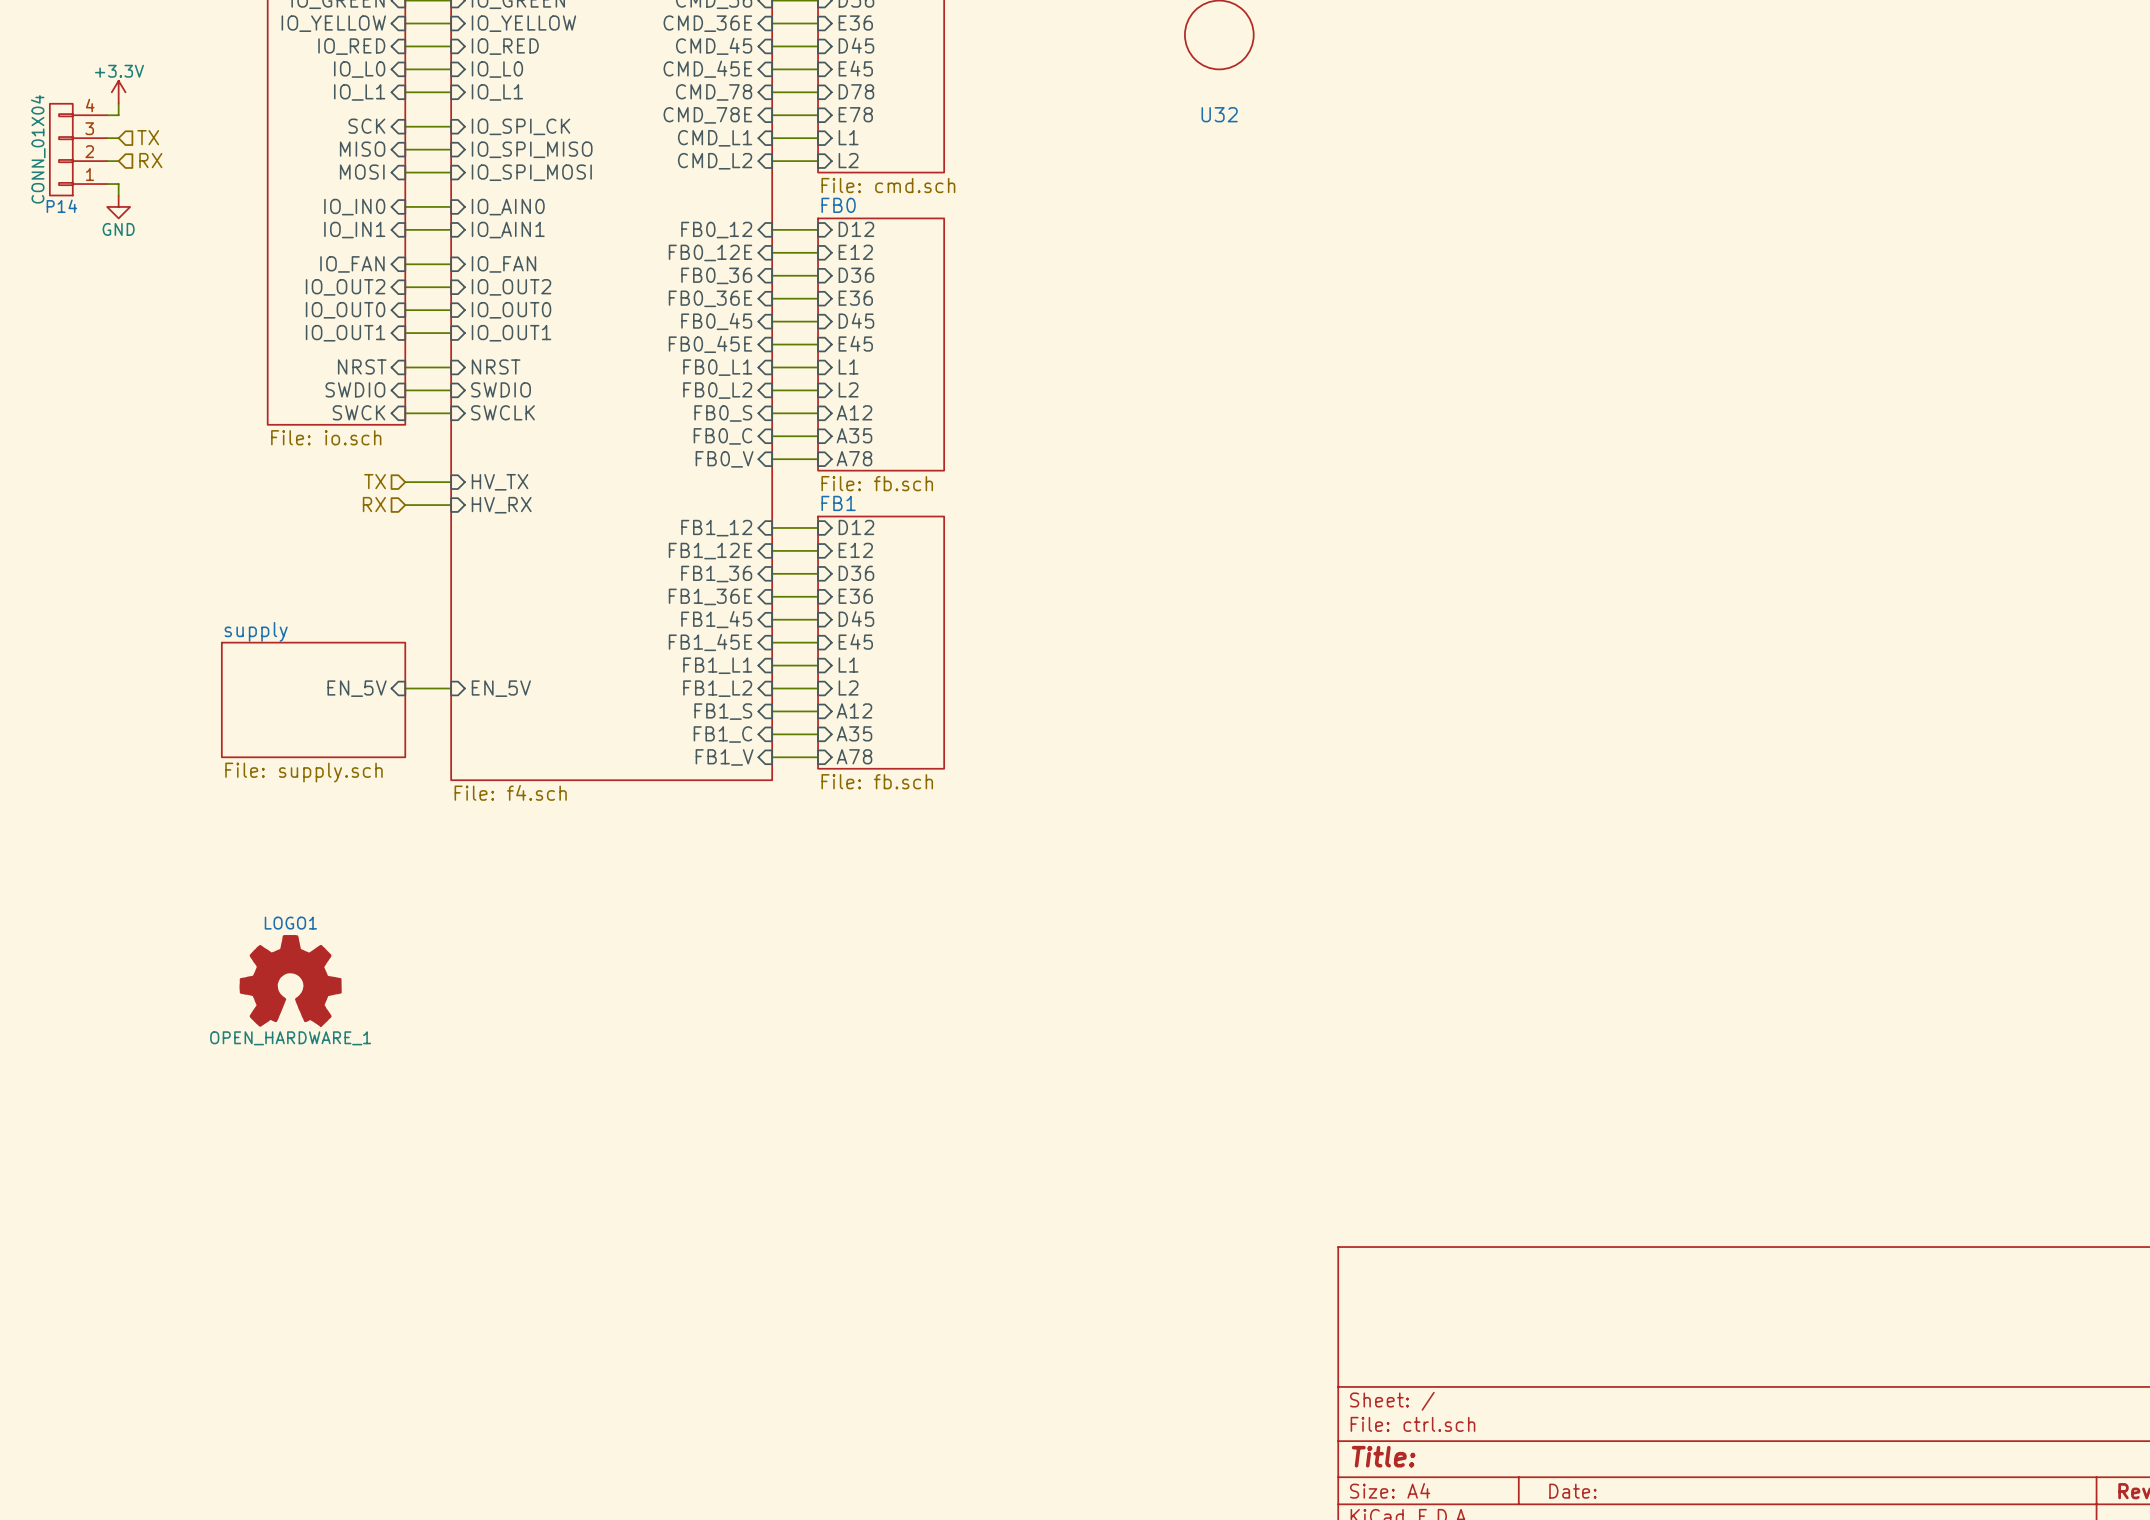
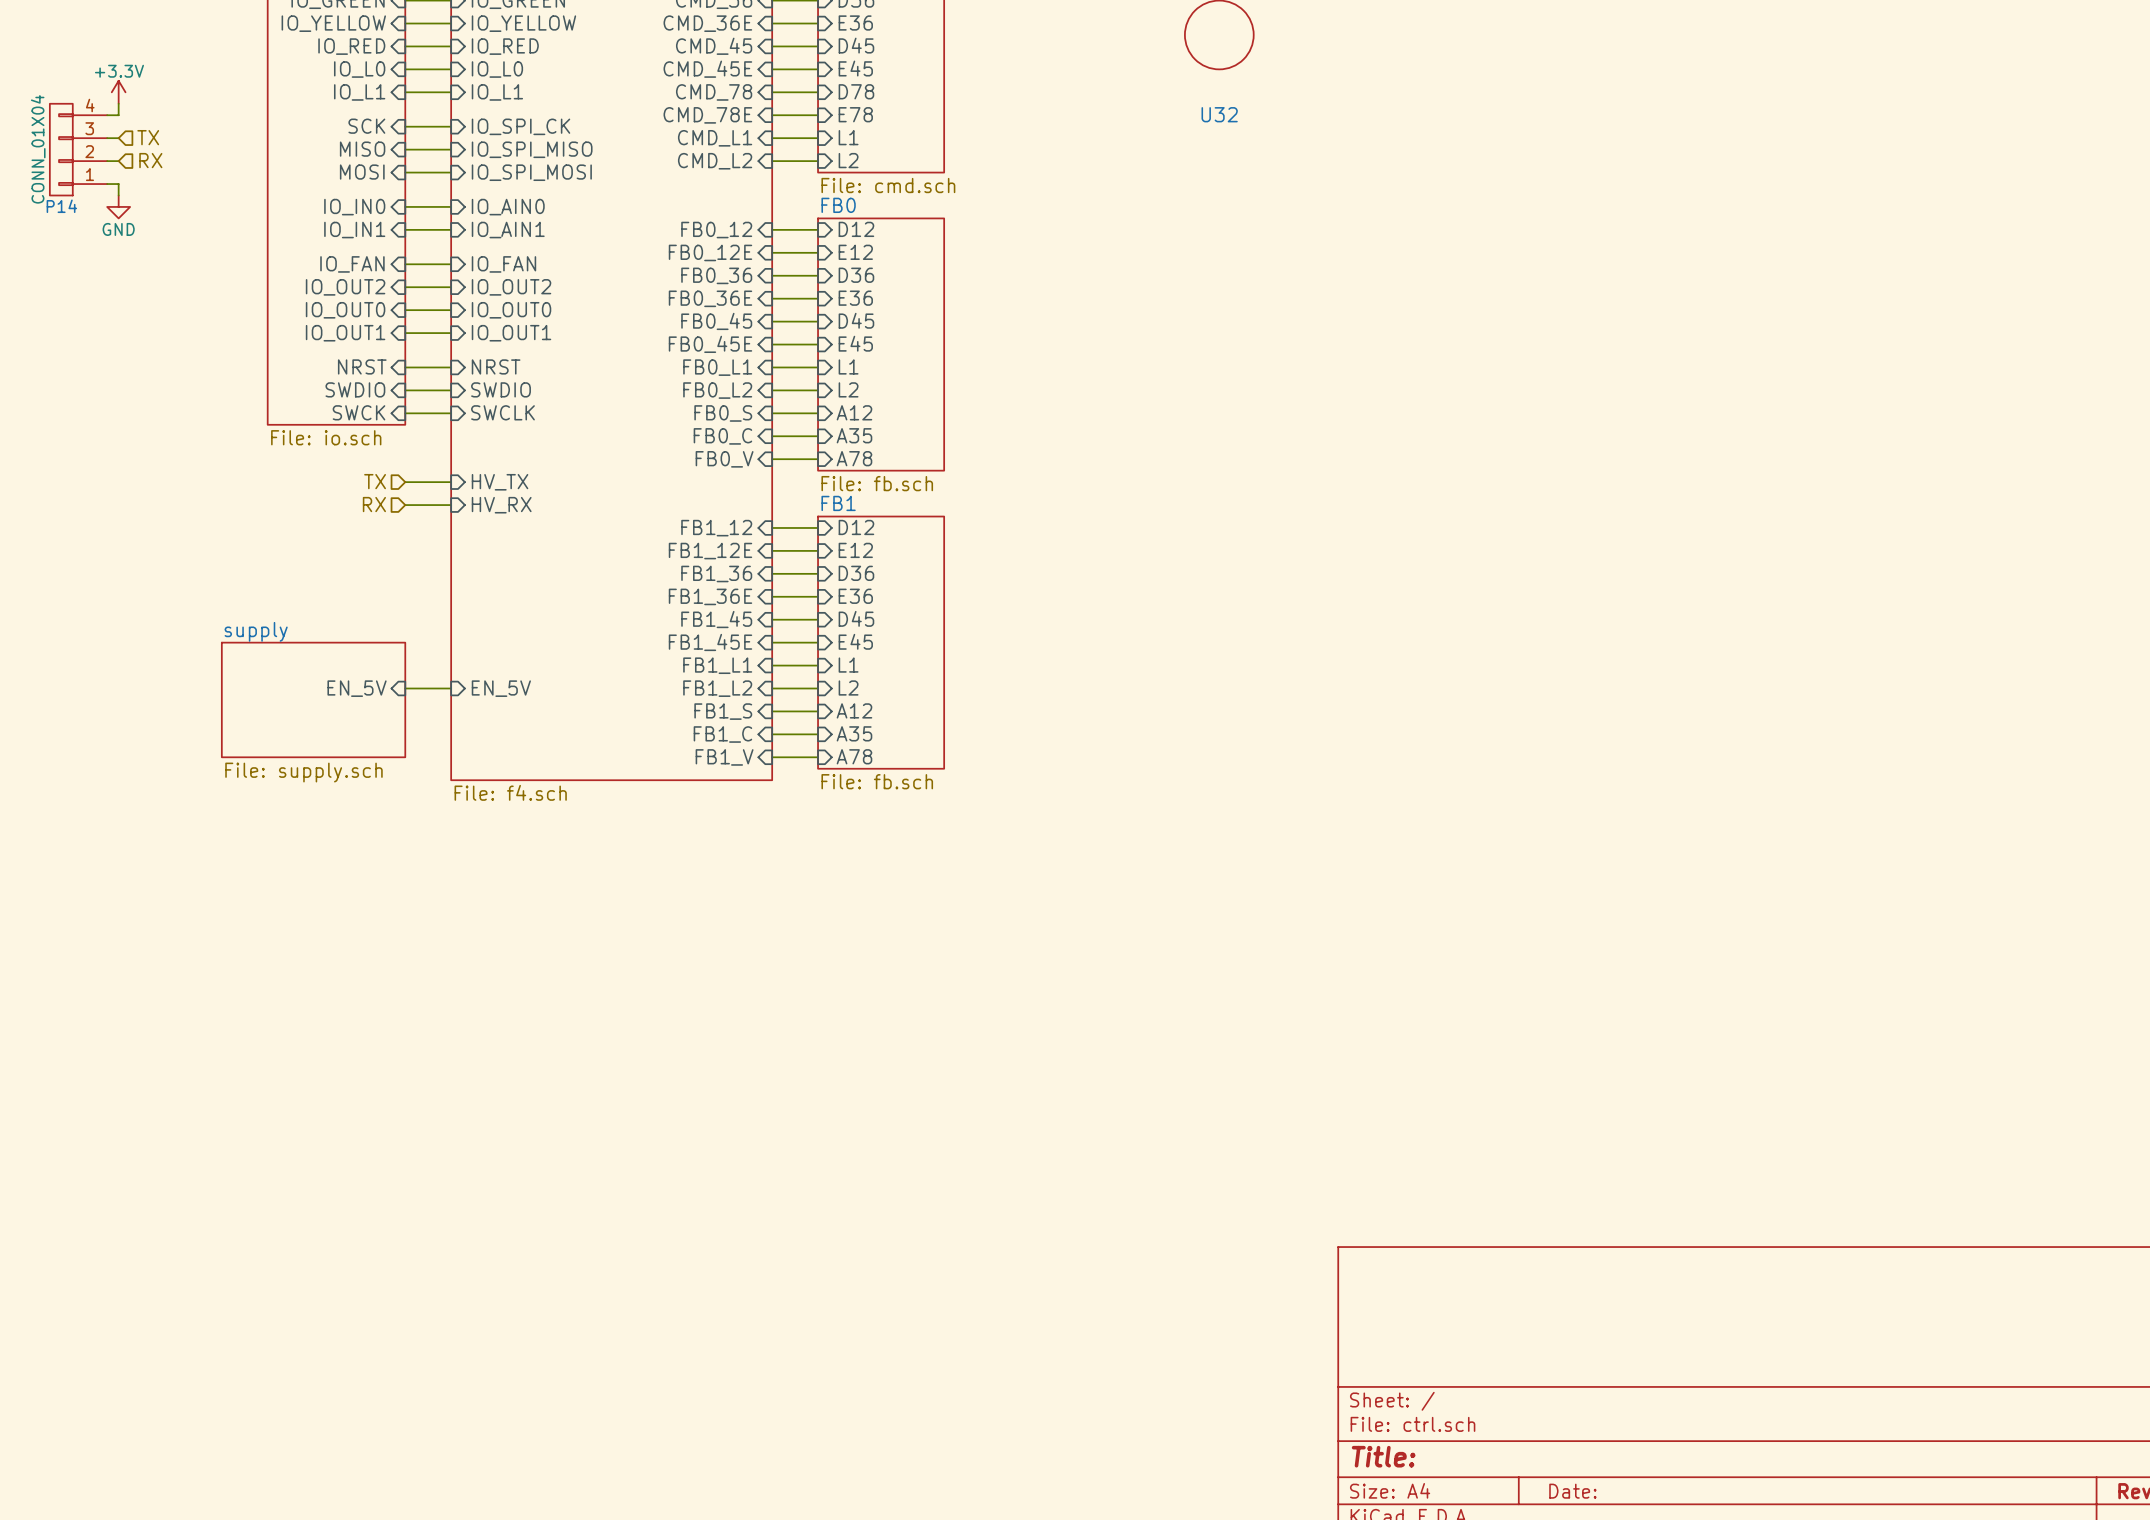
LOGO1: OPEN_HARDWARE_1 (290, 980) -> none

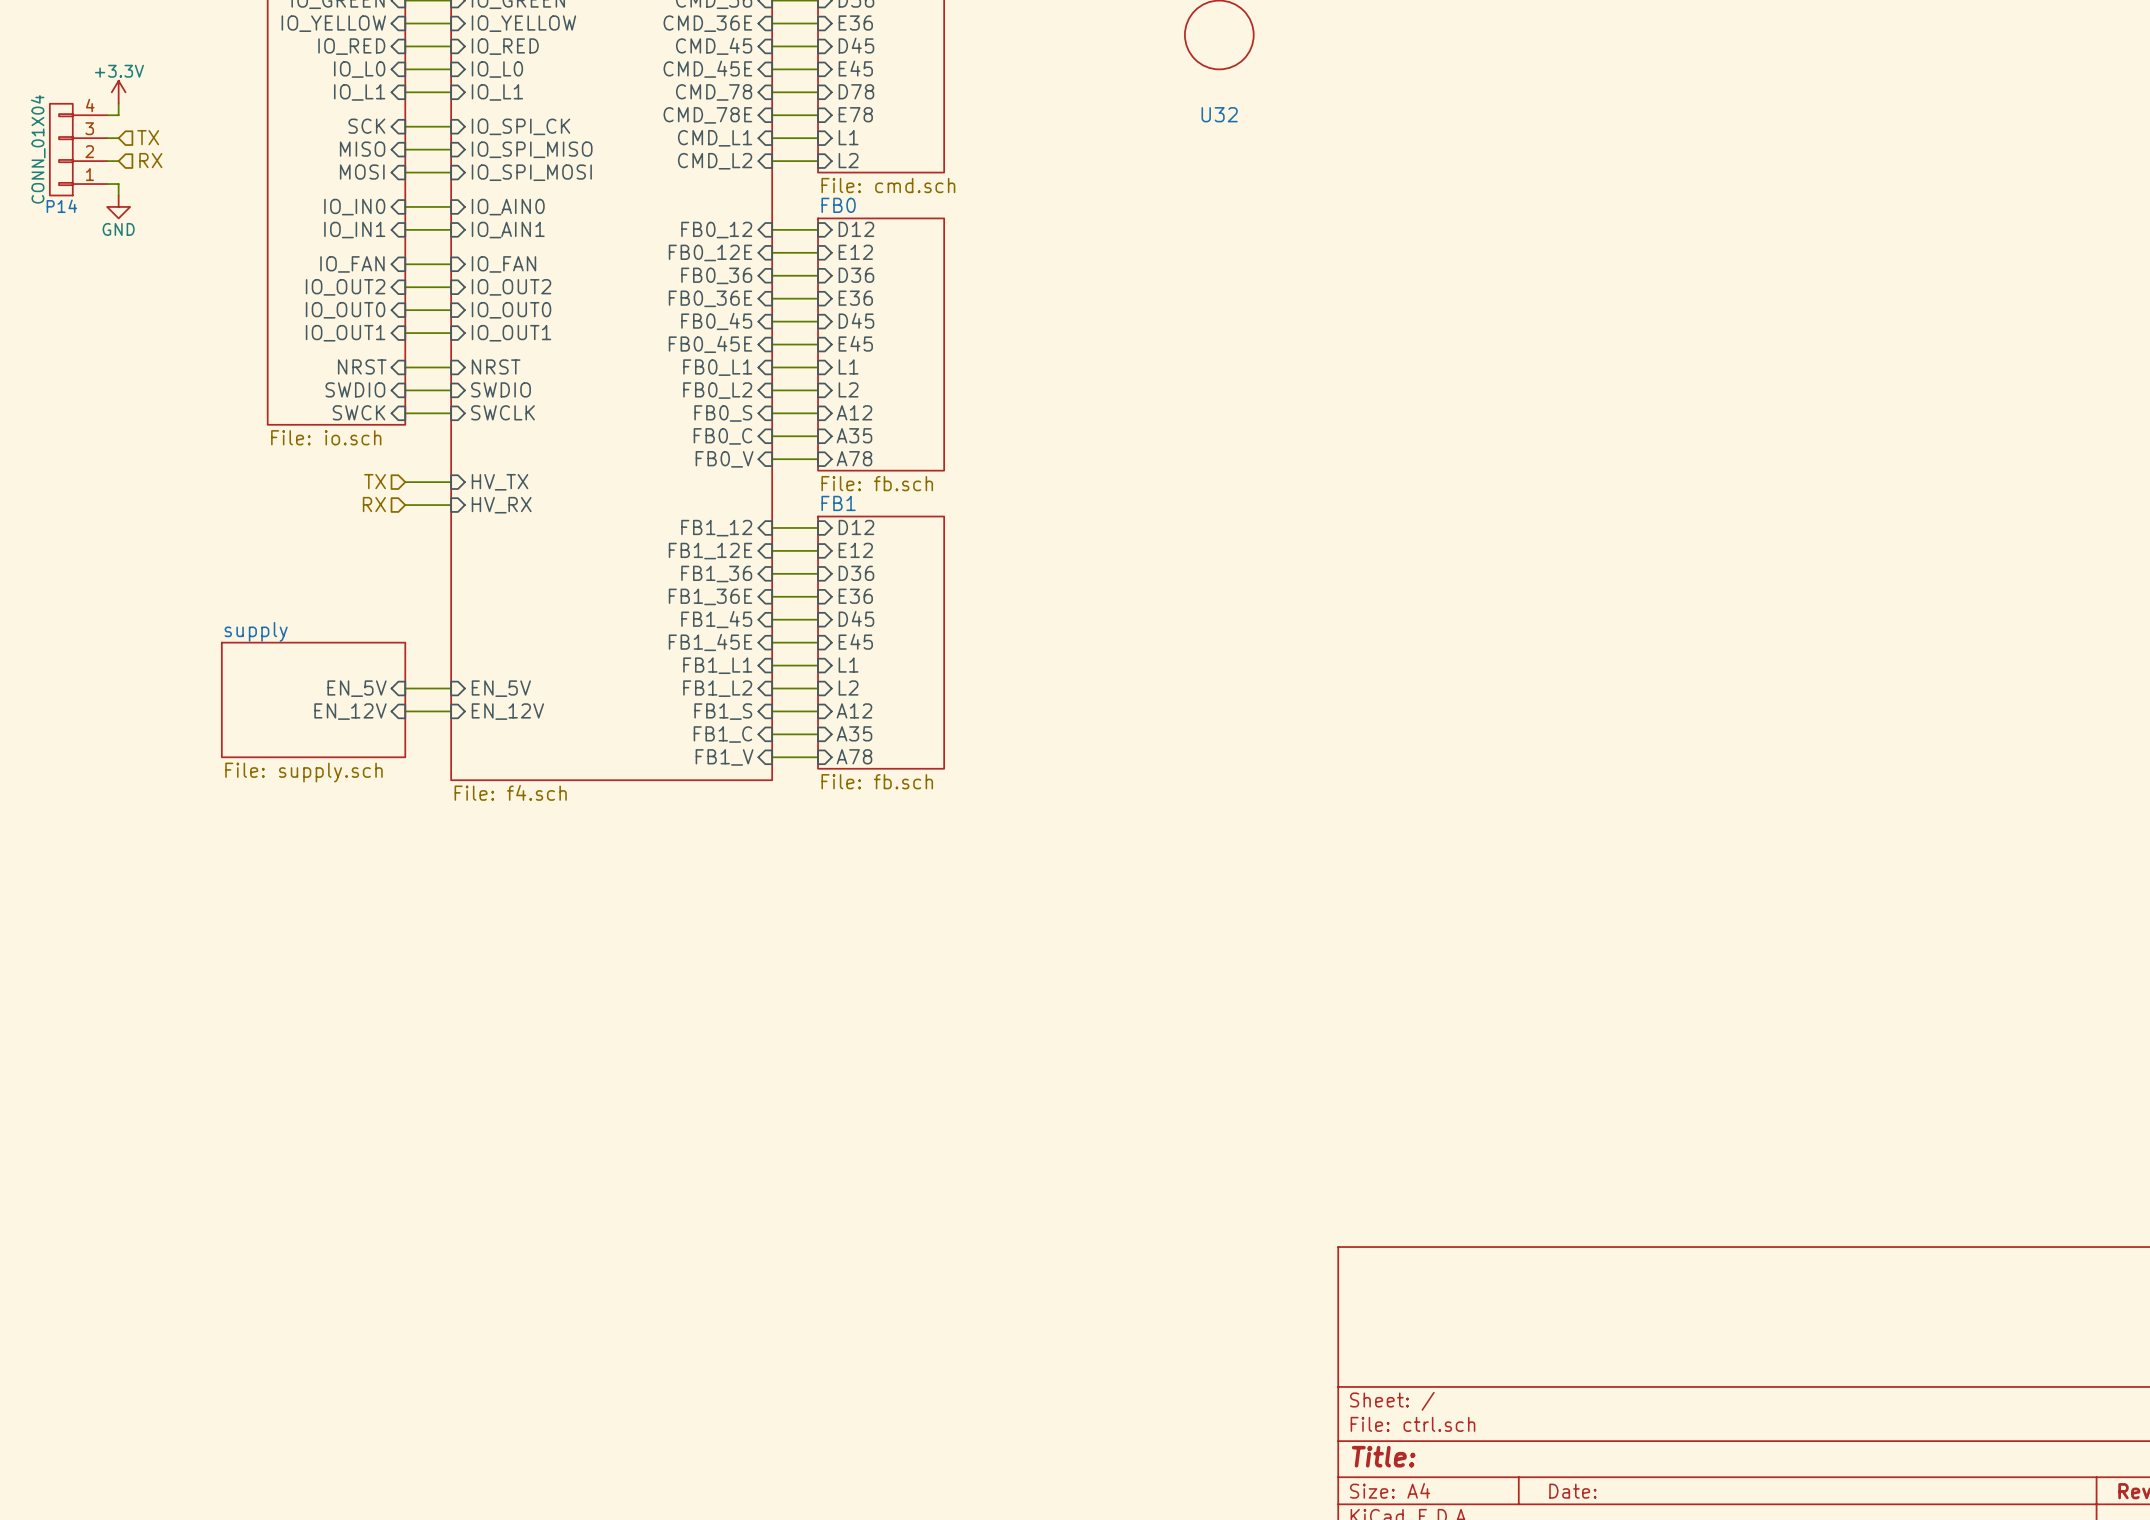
sheet pin: none -> EN_12V (350, 711)
wire: none -> (405, 711) (451, 711)
sheet pin: none -> EN_12V (507, 711)

